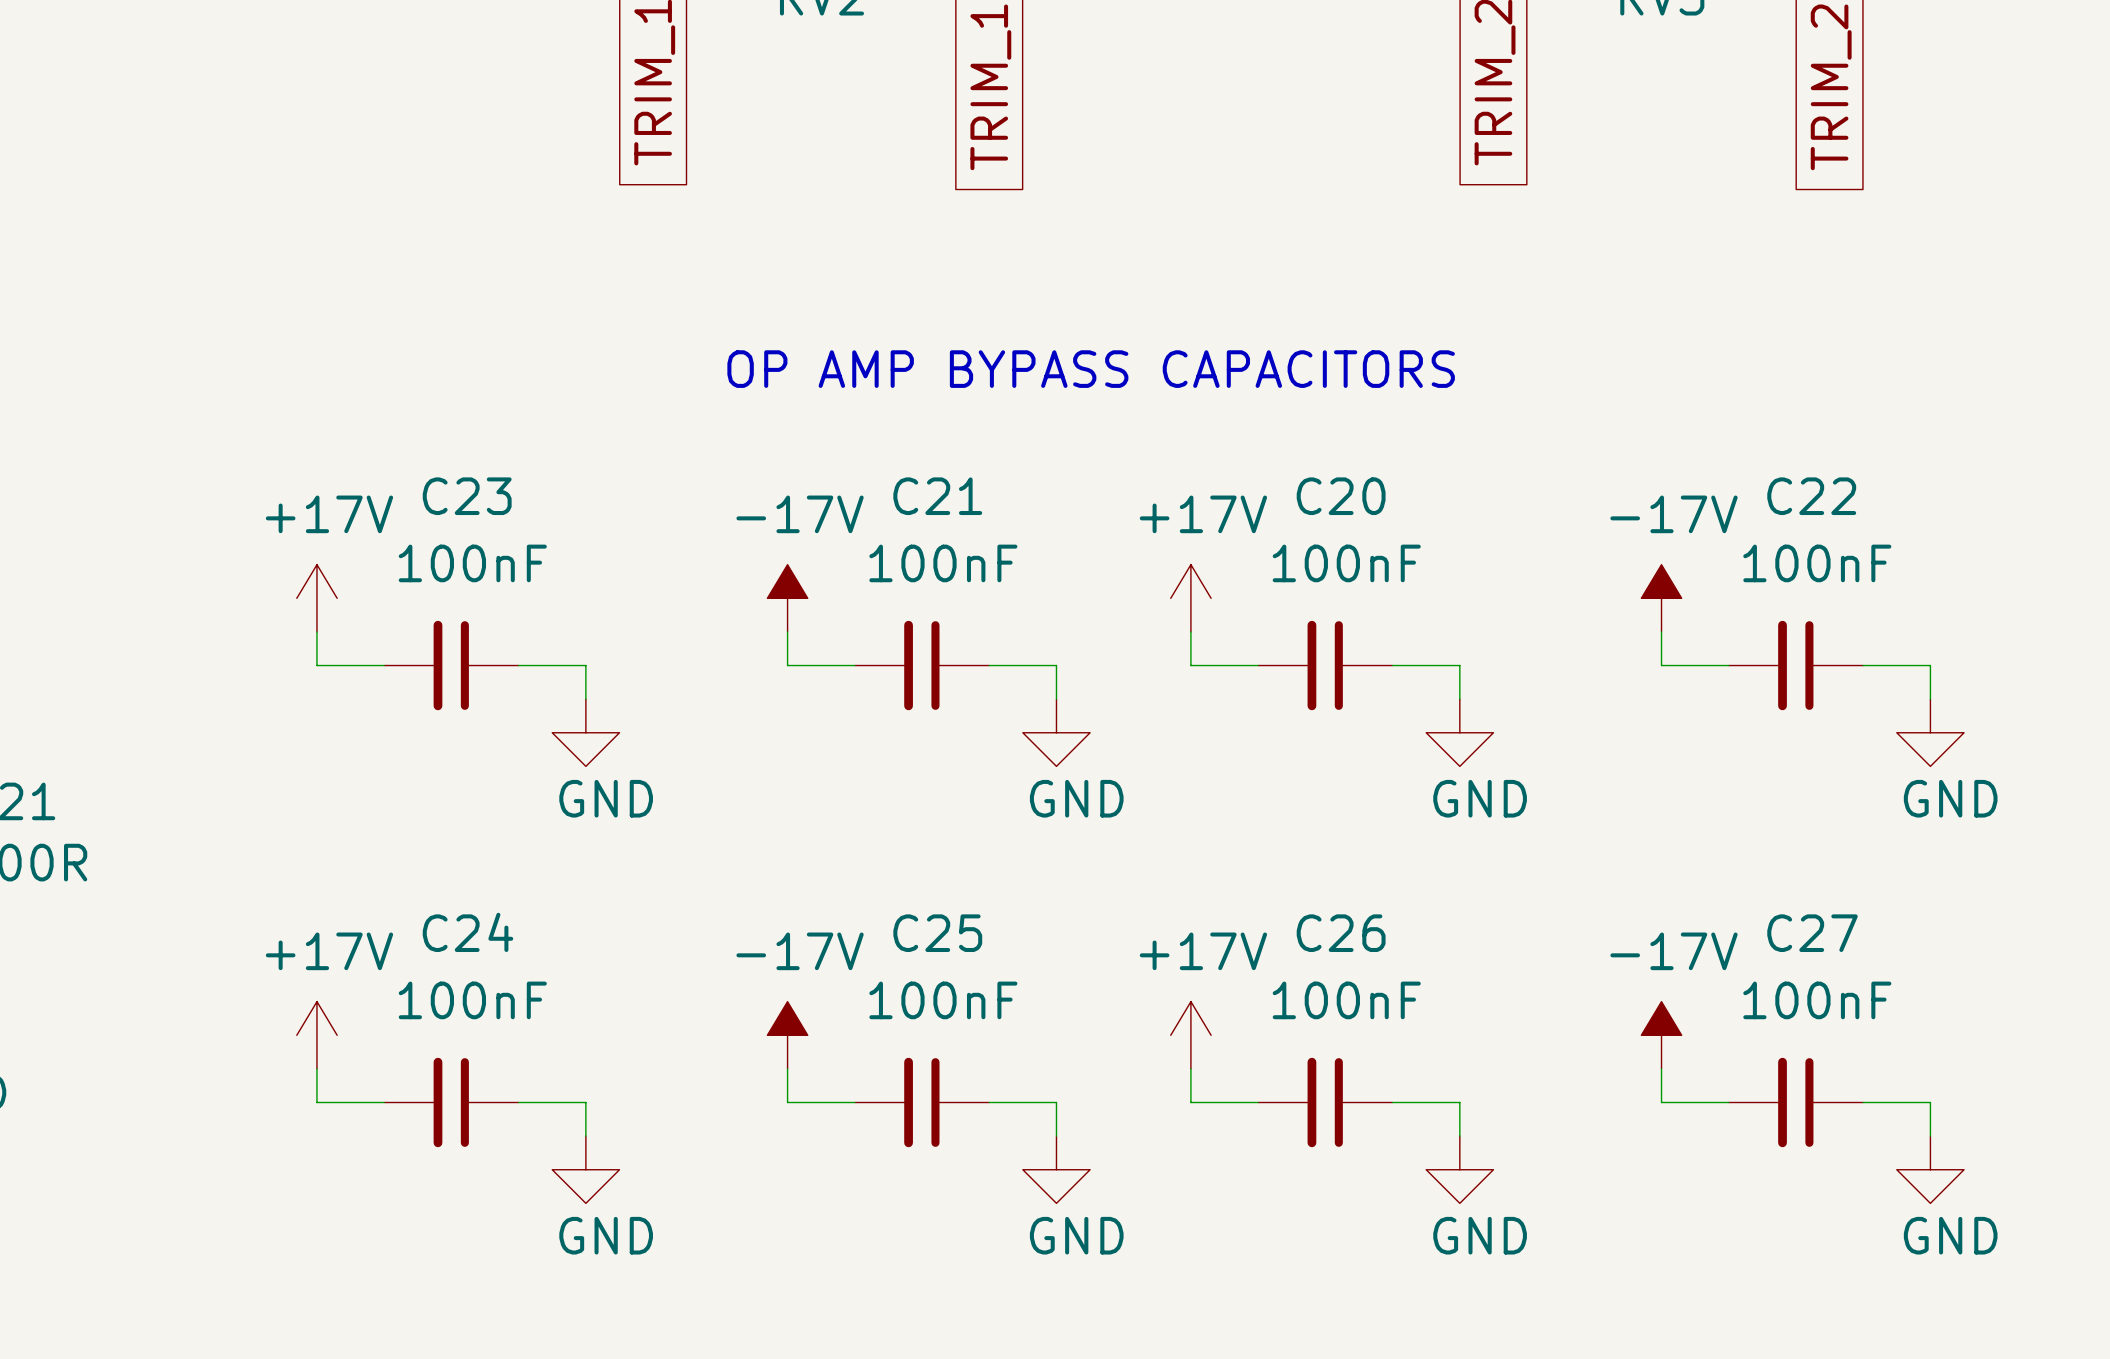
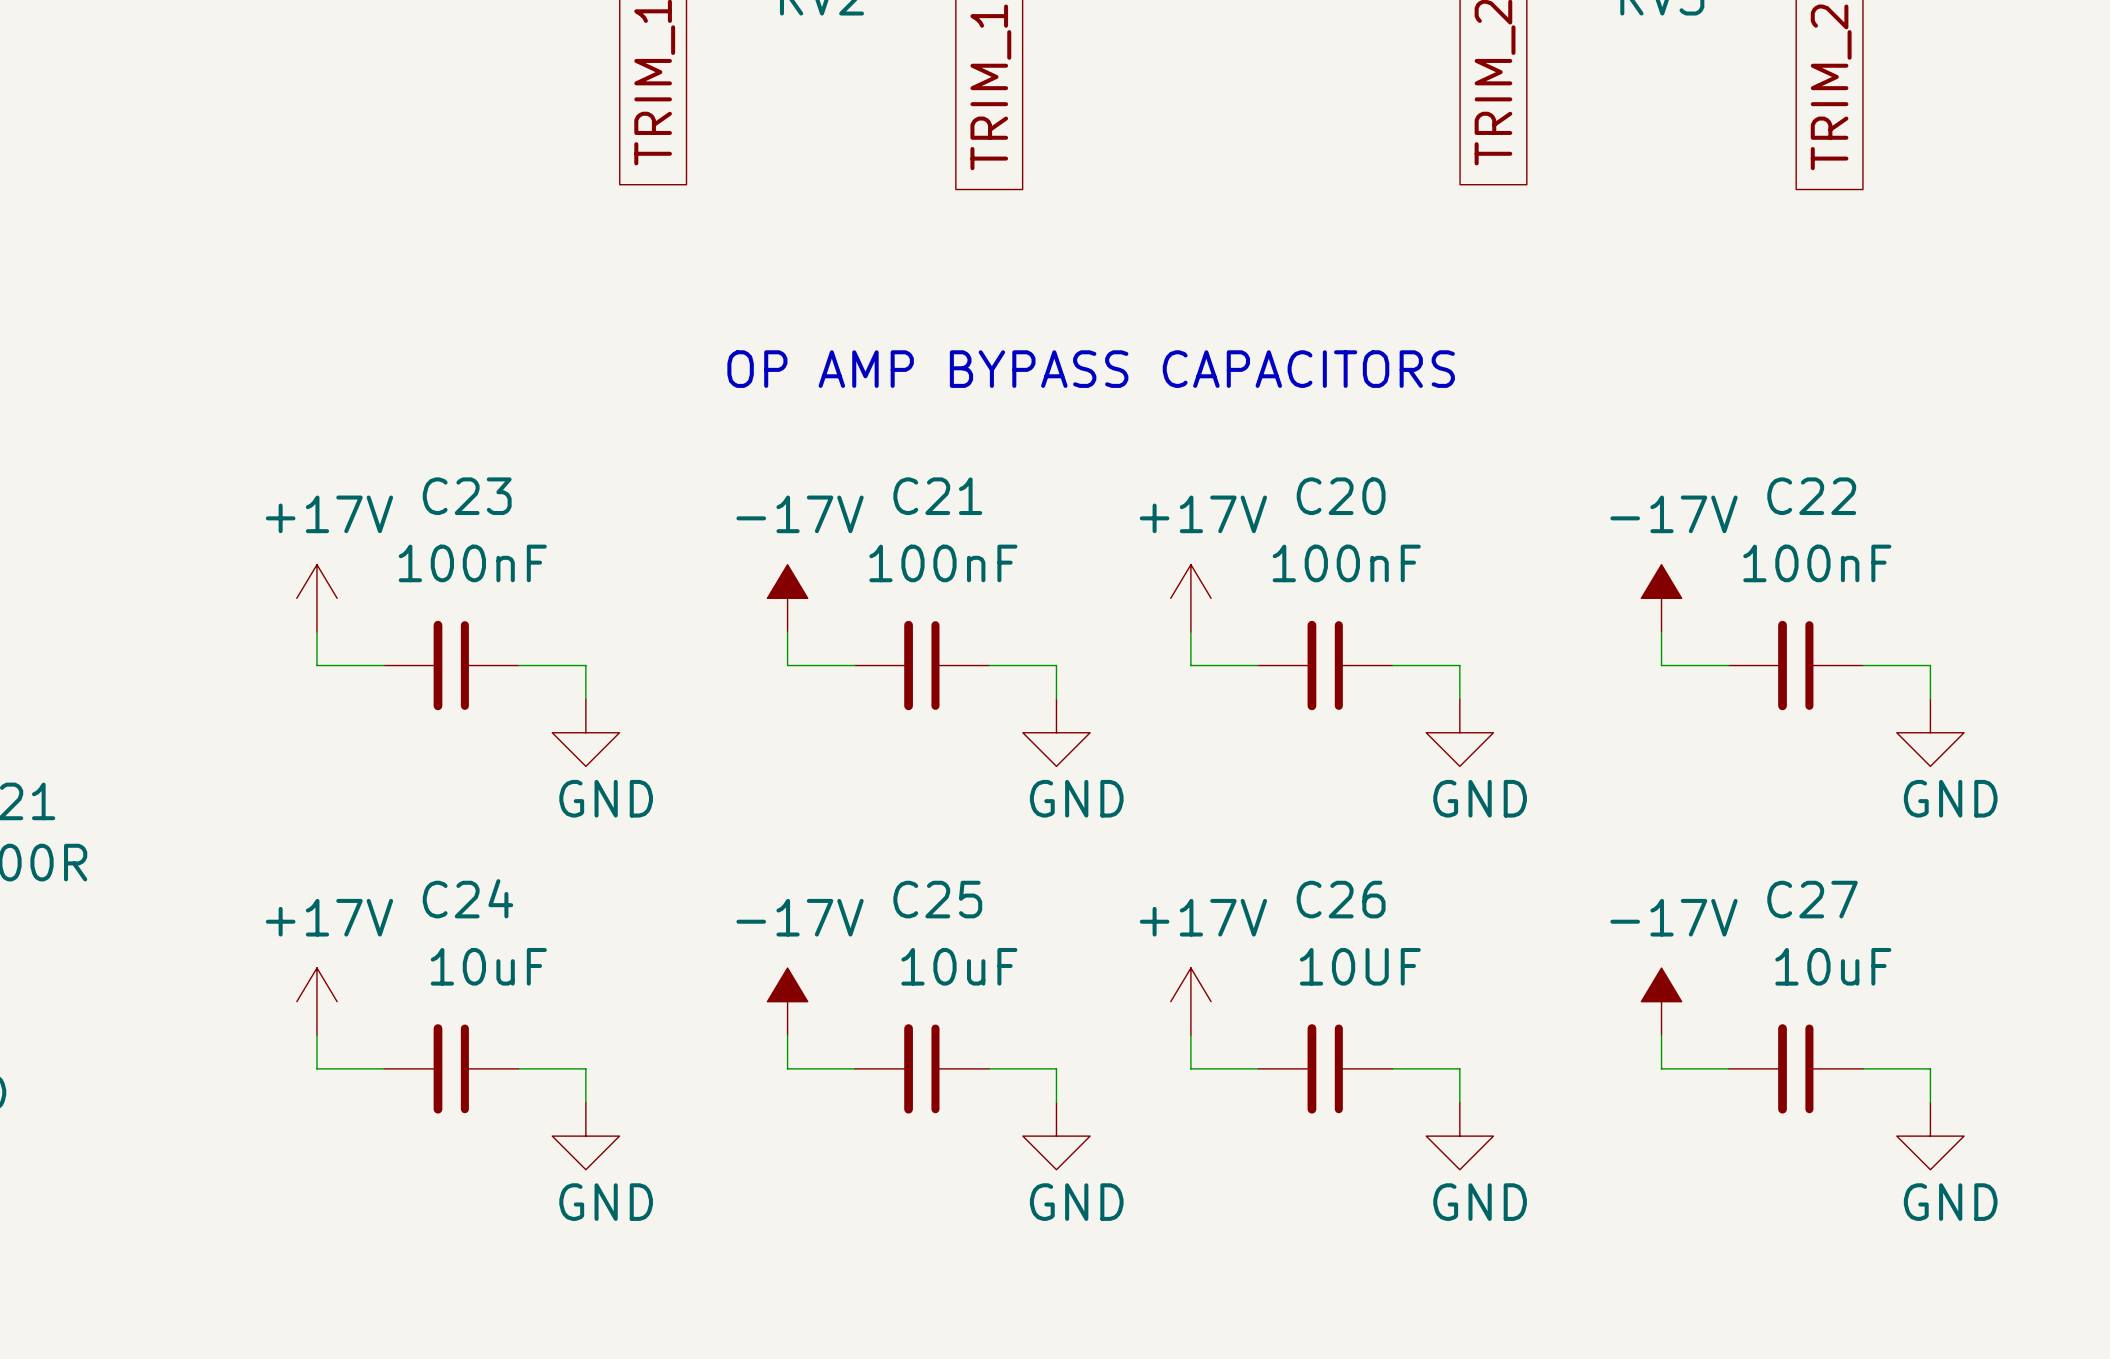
C24 value: 100nF (472, 1000) -> 10uF (488, 966)
C25 value: 100nF (943, 1000) -> 10uF (959, 966)
C26 value: 100nF (1346, 1000) -> 10UF (1360, 966)
C27 value: 100nF (1817, 1000) -> 10uF (1833, 966)
power symbol position: +17V (316, 1035) -> +17V (316, 1001)
power symbol position: -17V (787, 1035) -> -17V (787, 1001)
power symbol position: +17V (1190, 1035) -> +17V (1190, 1001)
power symbol position: -17V (1661, 1035) -> -17V (1661, 1001)
wire: (316, 1068) (316, 1102) (384, 1102) -> (316, 1035) (316, 1068) (384, 1068)
wire: (787, 1068) (787, 1102) (854, 1102) -> (787, 1035) (787, 1068) (854, 1068)
wire: (1190, 1068) (1190, 1102) (1258, 1102) -> (1190, 1035) (1190, 1068) (1258, 1068)
wire: (1661, 1068) (1661, 1102) (1728, 1102) -> (1661, 1035) (1661, 1068) (1728, 1068)
C24 position: (451, 1102) -> (451, 1068)
wire: (518, 1102) (585, 1102) (585, 1136) -> (518, 1068) (585, 1068) (585, 1102)
C25 position: (922, 1102) -> (922, 1068)
wire: (989, 1102) (1056, 1102) (1056, 1136) -> (989, 1068) (1056, 1068) (1056, 1102)
C26 position: (1325, 1102) -> (1325, 1068)
wire: (1392, 1102) (1459, 1102) (1459, 1136) -> (1392, 1068) (1459, 1068) (1459, 1102)
C27 position: (1795, 1102) -> (1795, 1068)
wire: (1863, 1102) (1930, 1102) (1930, 1136) -> (1863, 1068) (1930, 1068) (1930, 1102)
power symbol position: GND (585, 1169) -> GND (585, 1136)
power symbol position: GND (1056, 1169) -> GND (1056, 1136)
power symbol position: GND (1459, 1169) -> GND (1459, 1136)
power symbol position: GND (1930, 1169) -> GND (1930, 1136)

